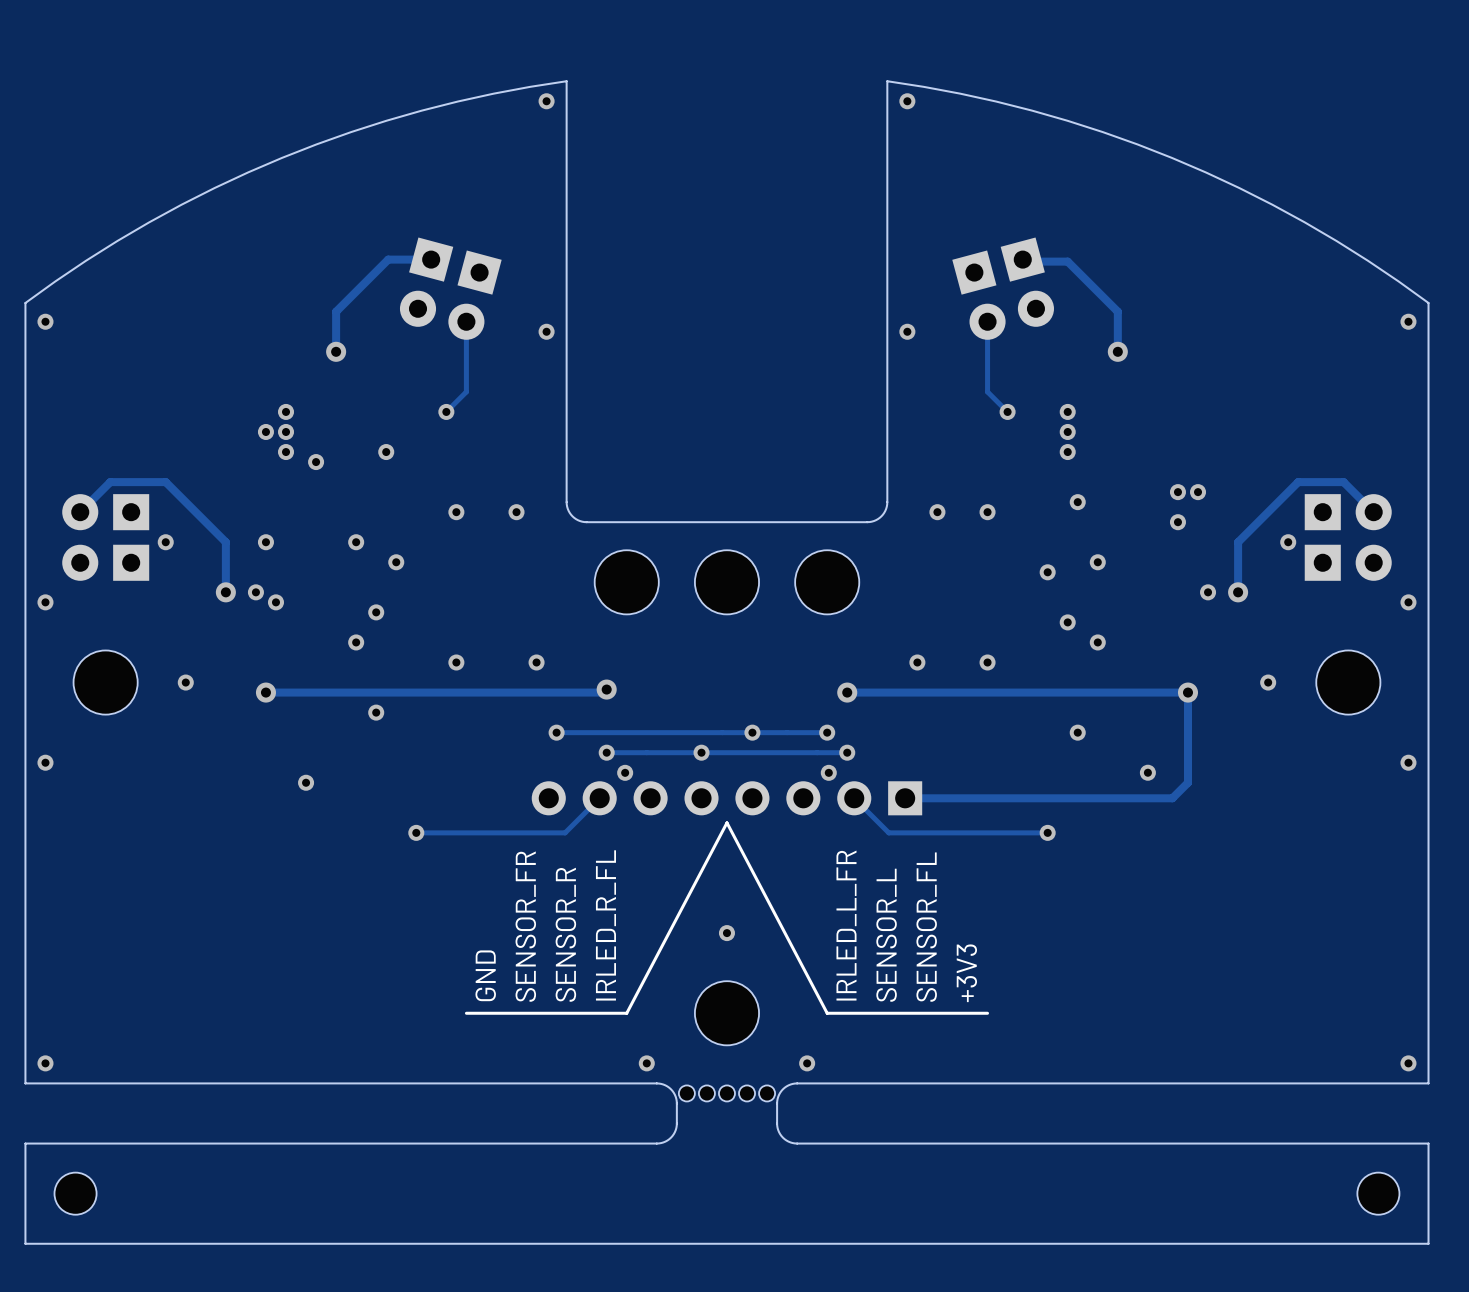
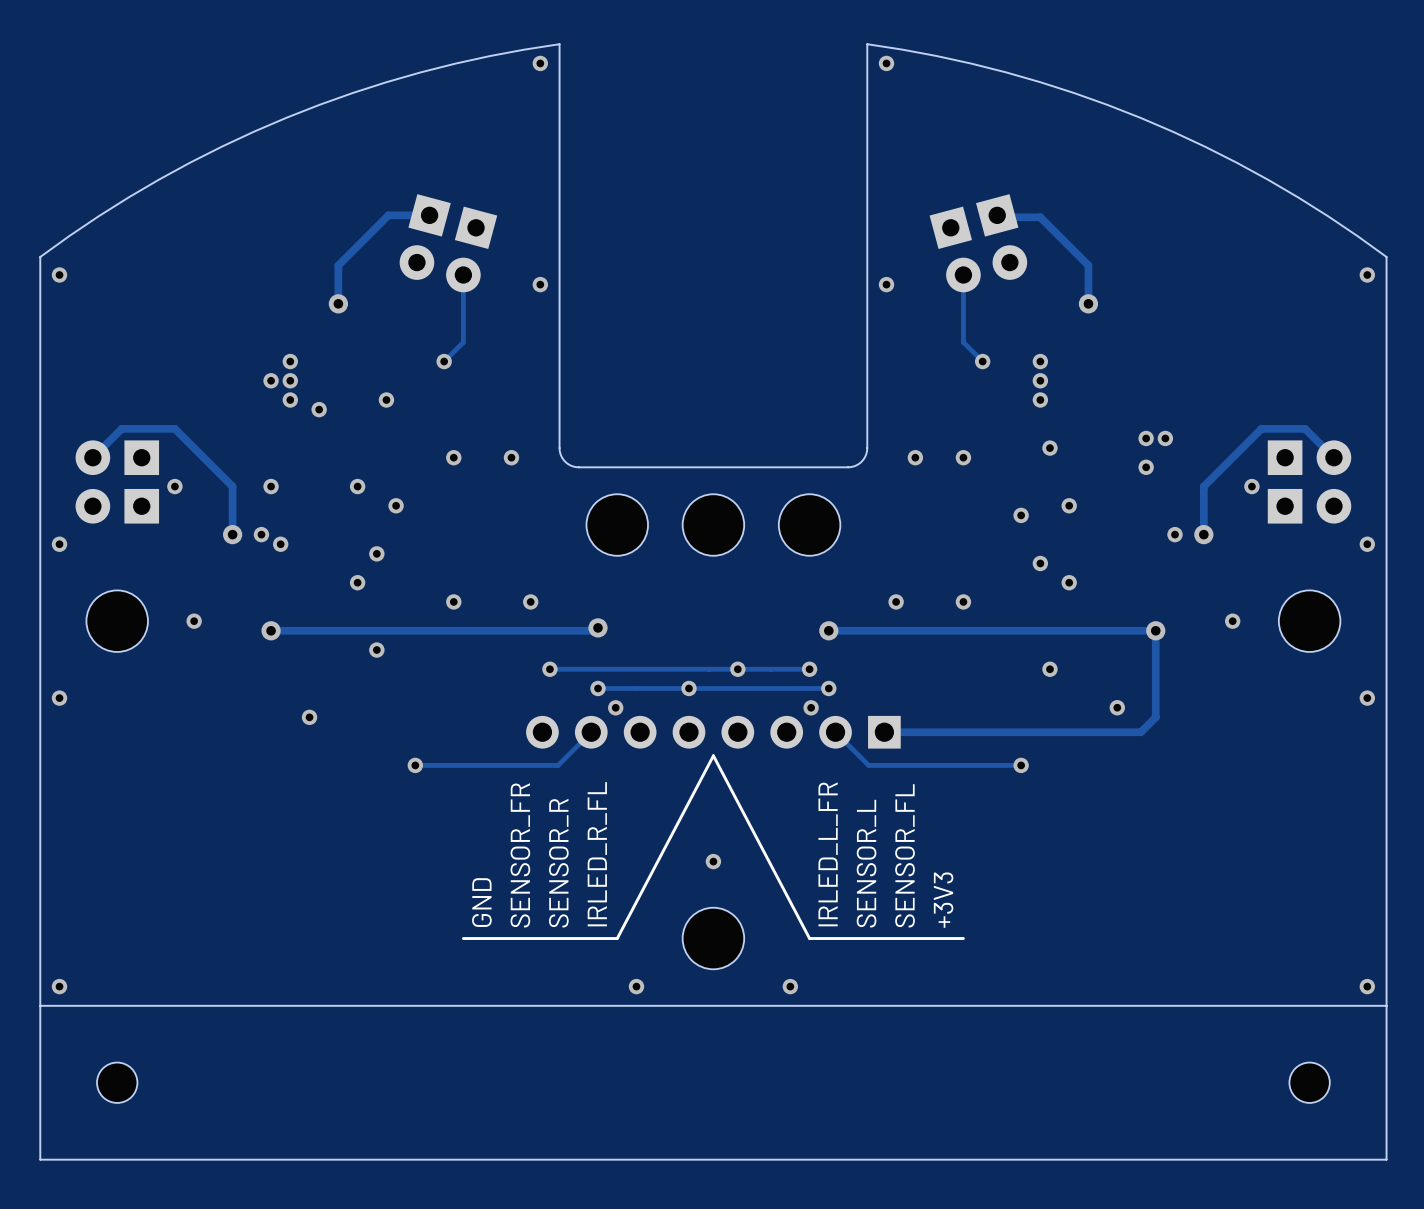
board edge: (656, 1083) (670, 1089) (676, 1103) (674, 1132) (669, 1139) (659, 1143) (25, 1143) -> (40, 1005) (40, 1063)
board edge: (797, 1083) (782, 1089) (777, 1103) (779, 1132) (786, 1140) (794, 1143) (1428, 1143) -> (1386, 1005) (1386, 1063)
board edge: none -> (780, 1005) (646, 1005)
part: (686, 1093) -> none
part: (706, 1093) -> none
part: (726, 1093) -> none
part: (747, 1093) -> none
part: (767, 1093) -> none
part position: (75, 1193) -> (117, 1082)
part position: (1378, 1193) -> (1309, 1082)

